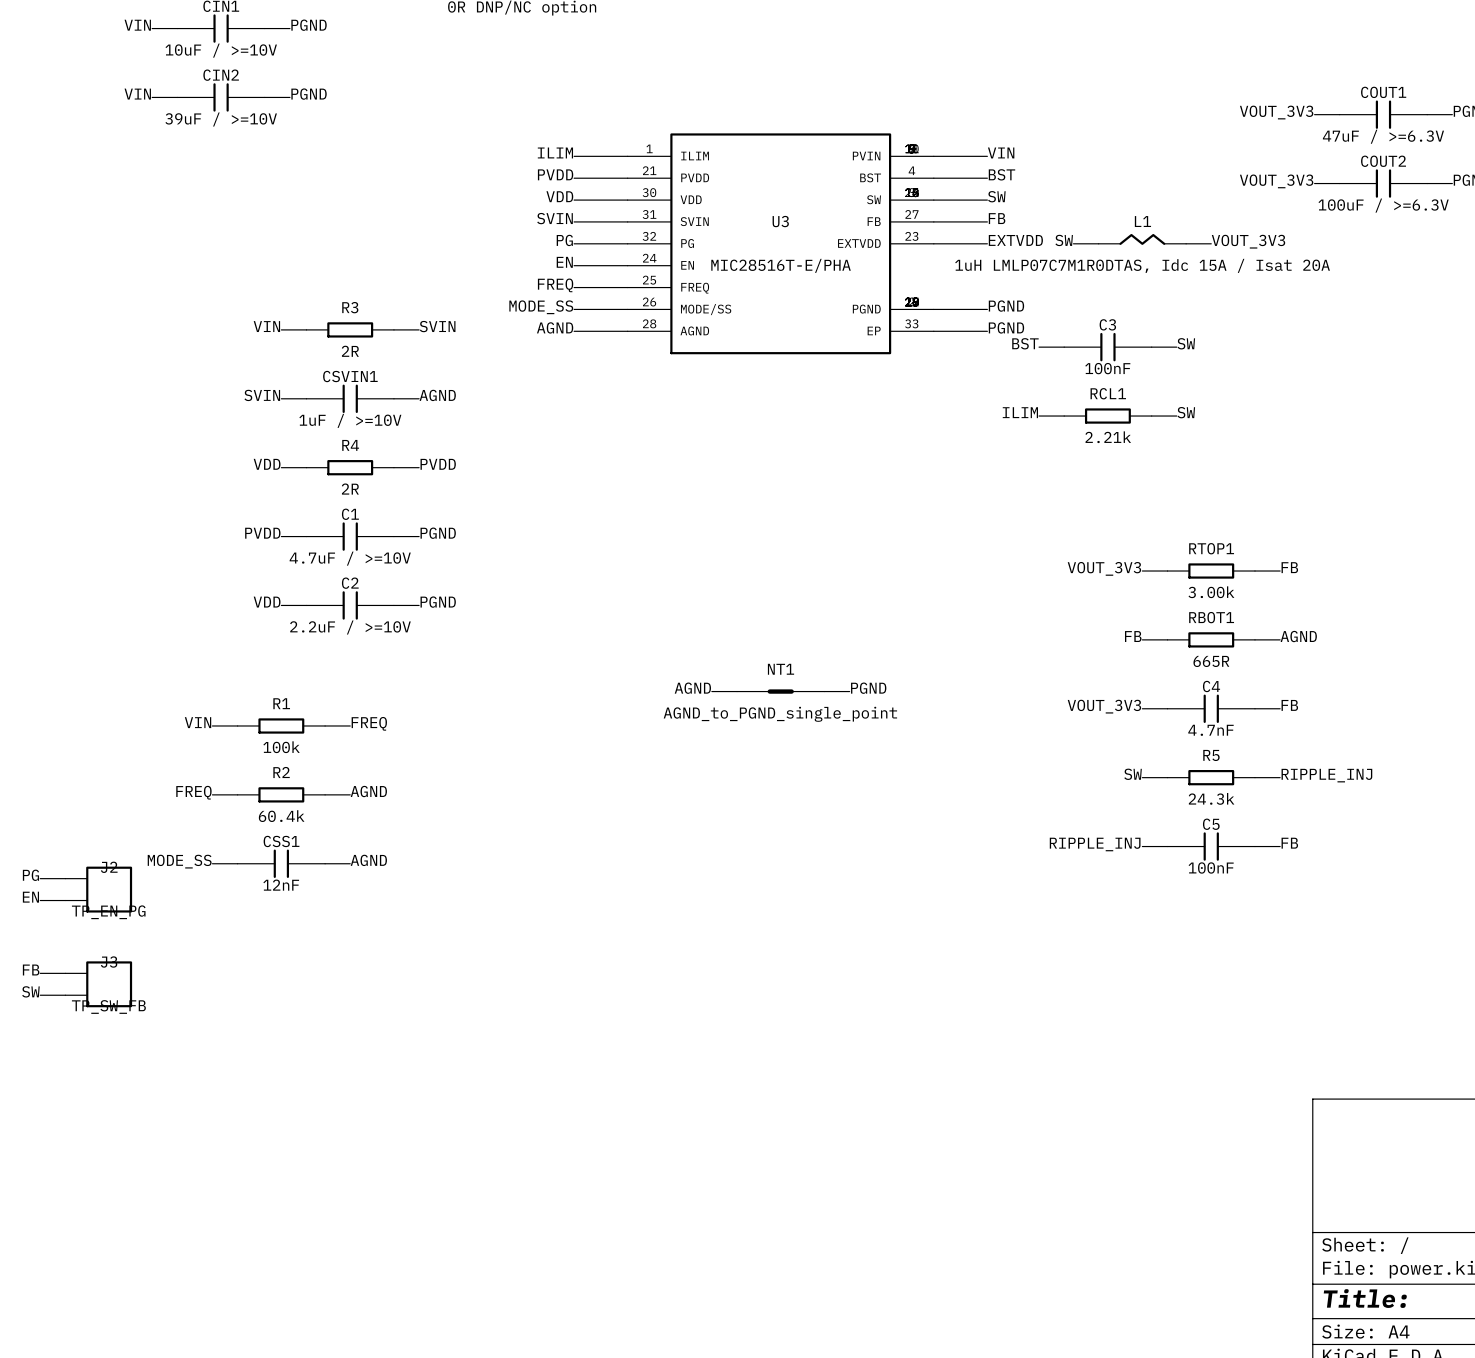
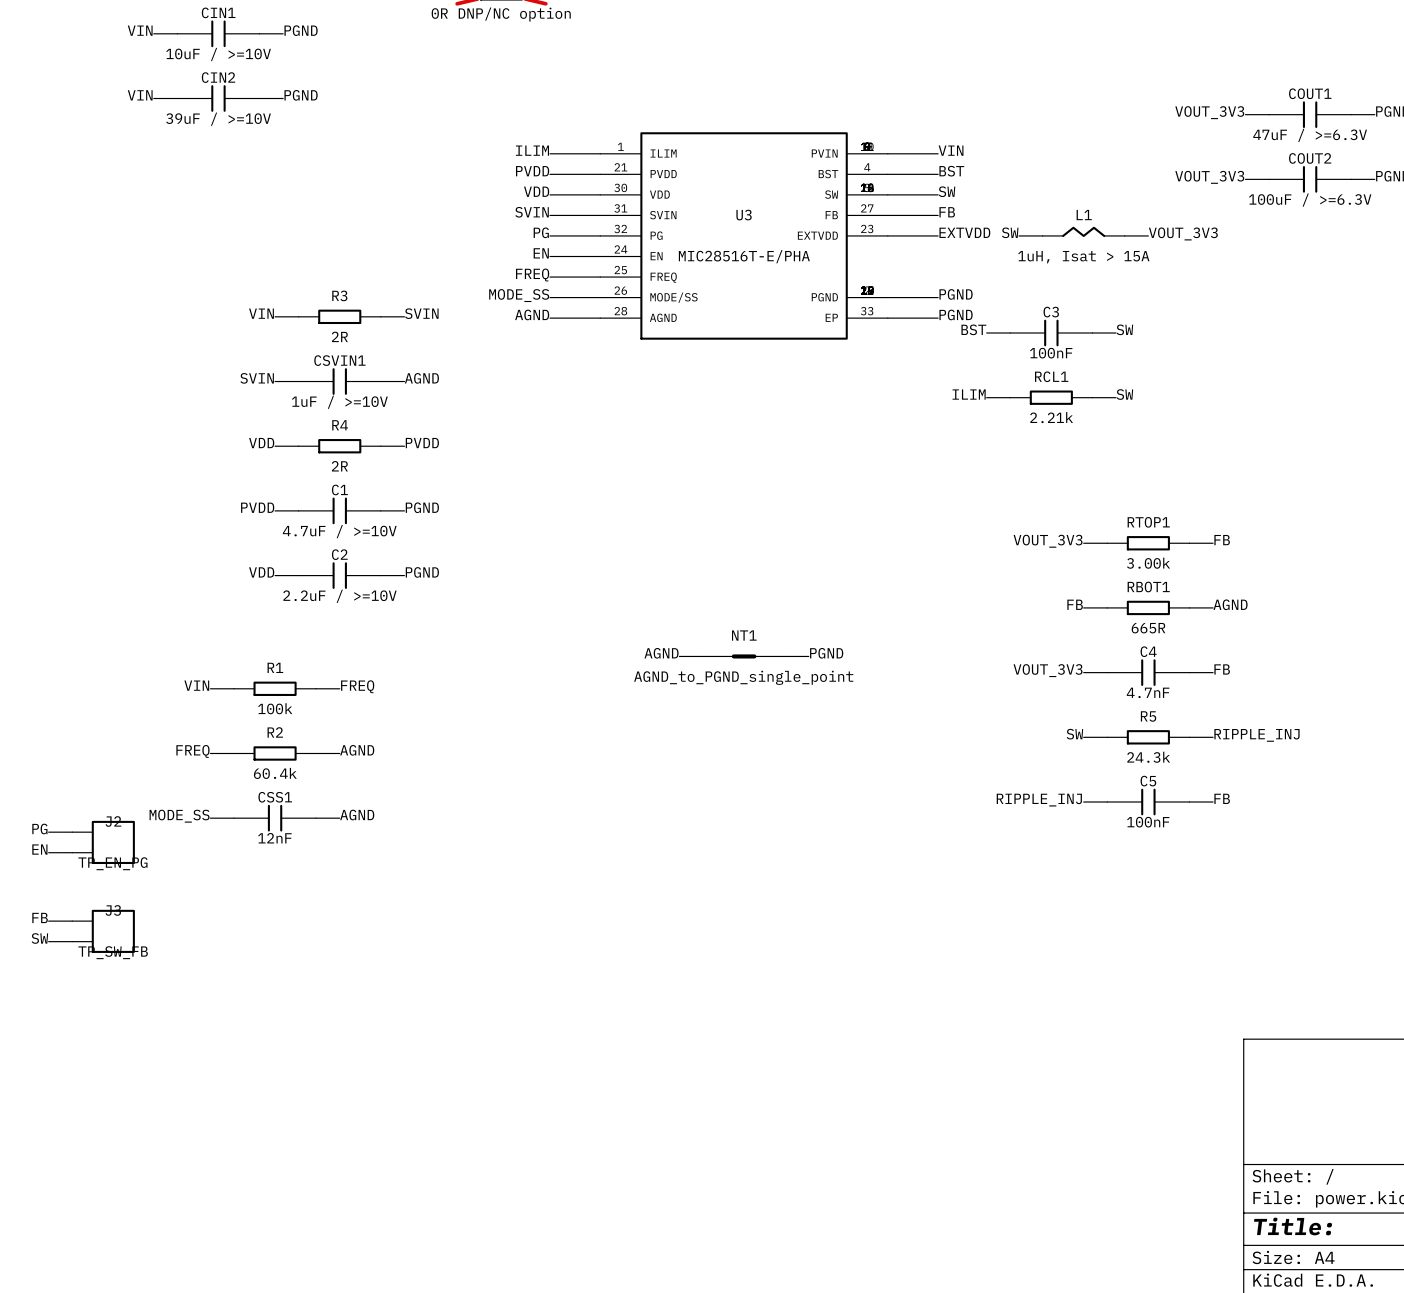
L1 value: 1uH LMLP07C7M1R0DTAS, Idc 15A / Isat 20A (1142, 265) -> 1uH, Isat > 15A (1083, 257)

